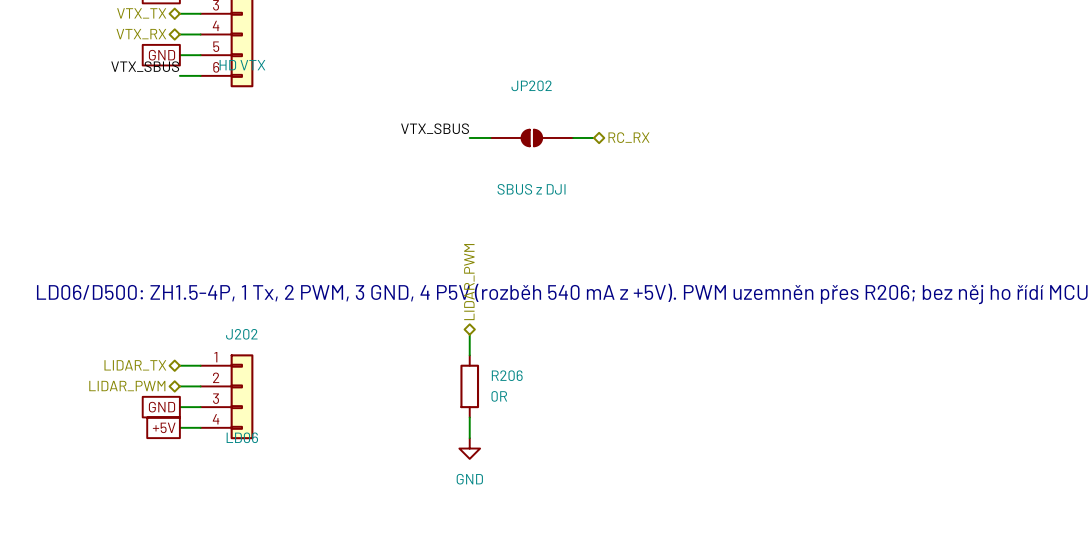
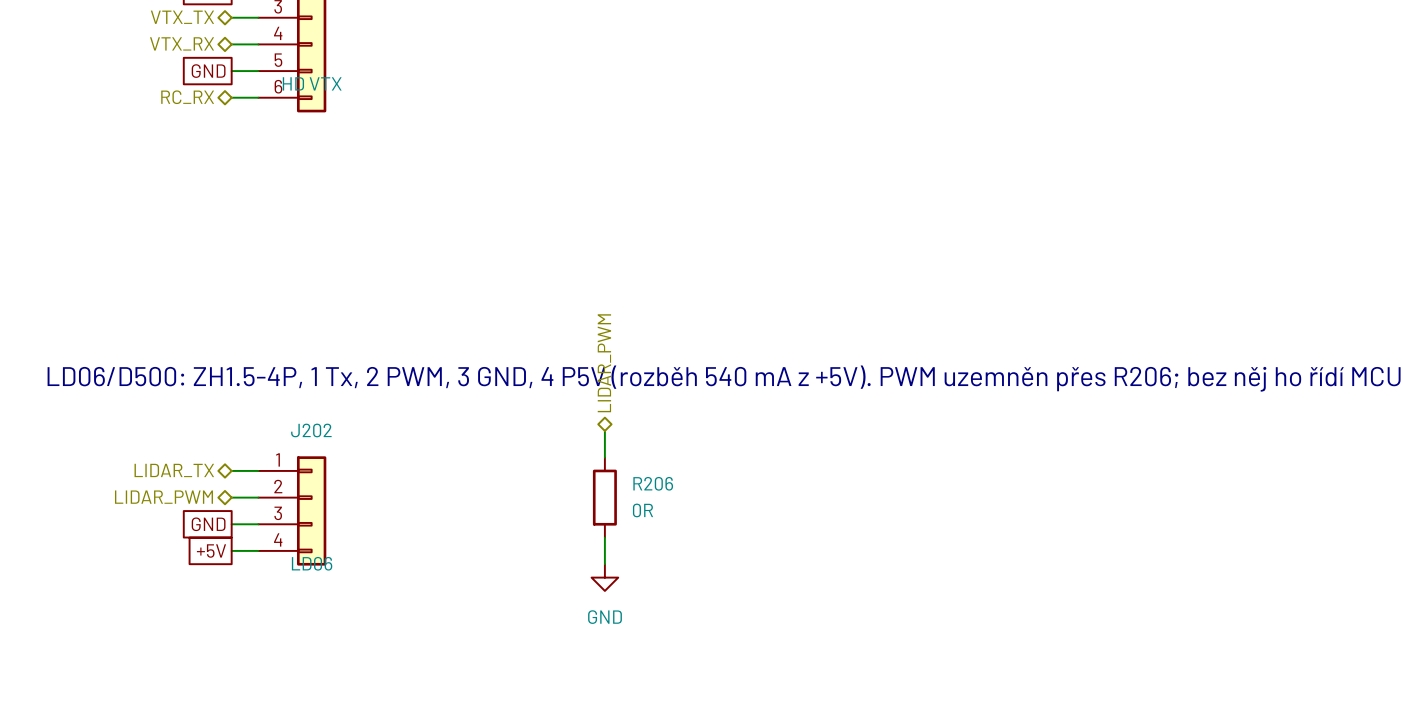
label: VTX_SBUS (145, 66) -> none
hierarchical label: none -> RC_RX (187, 97)
label: VTX_SBUS (435, 128) -> none
wire: (469, 137) (490, 137) -> none
JP202: SBUS z DJI (531, 137) -> none
wire: (573, 137) (593, 137) -> none
hierarchical label: RC_RX (628, 137) -> none

